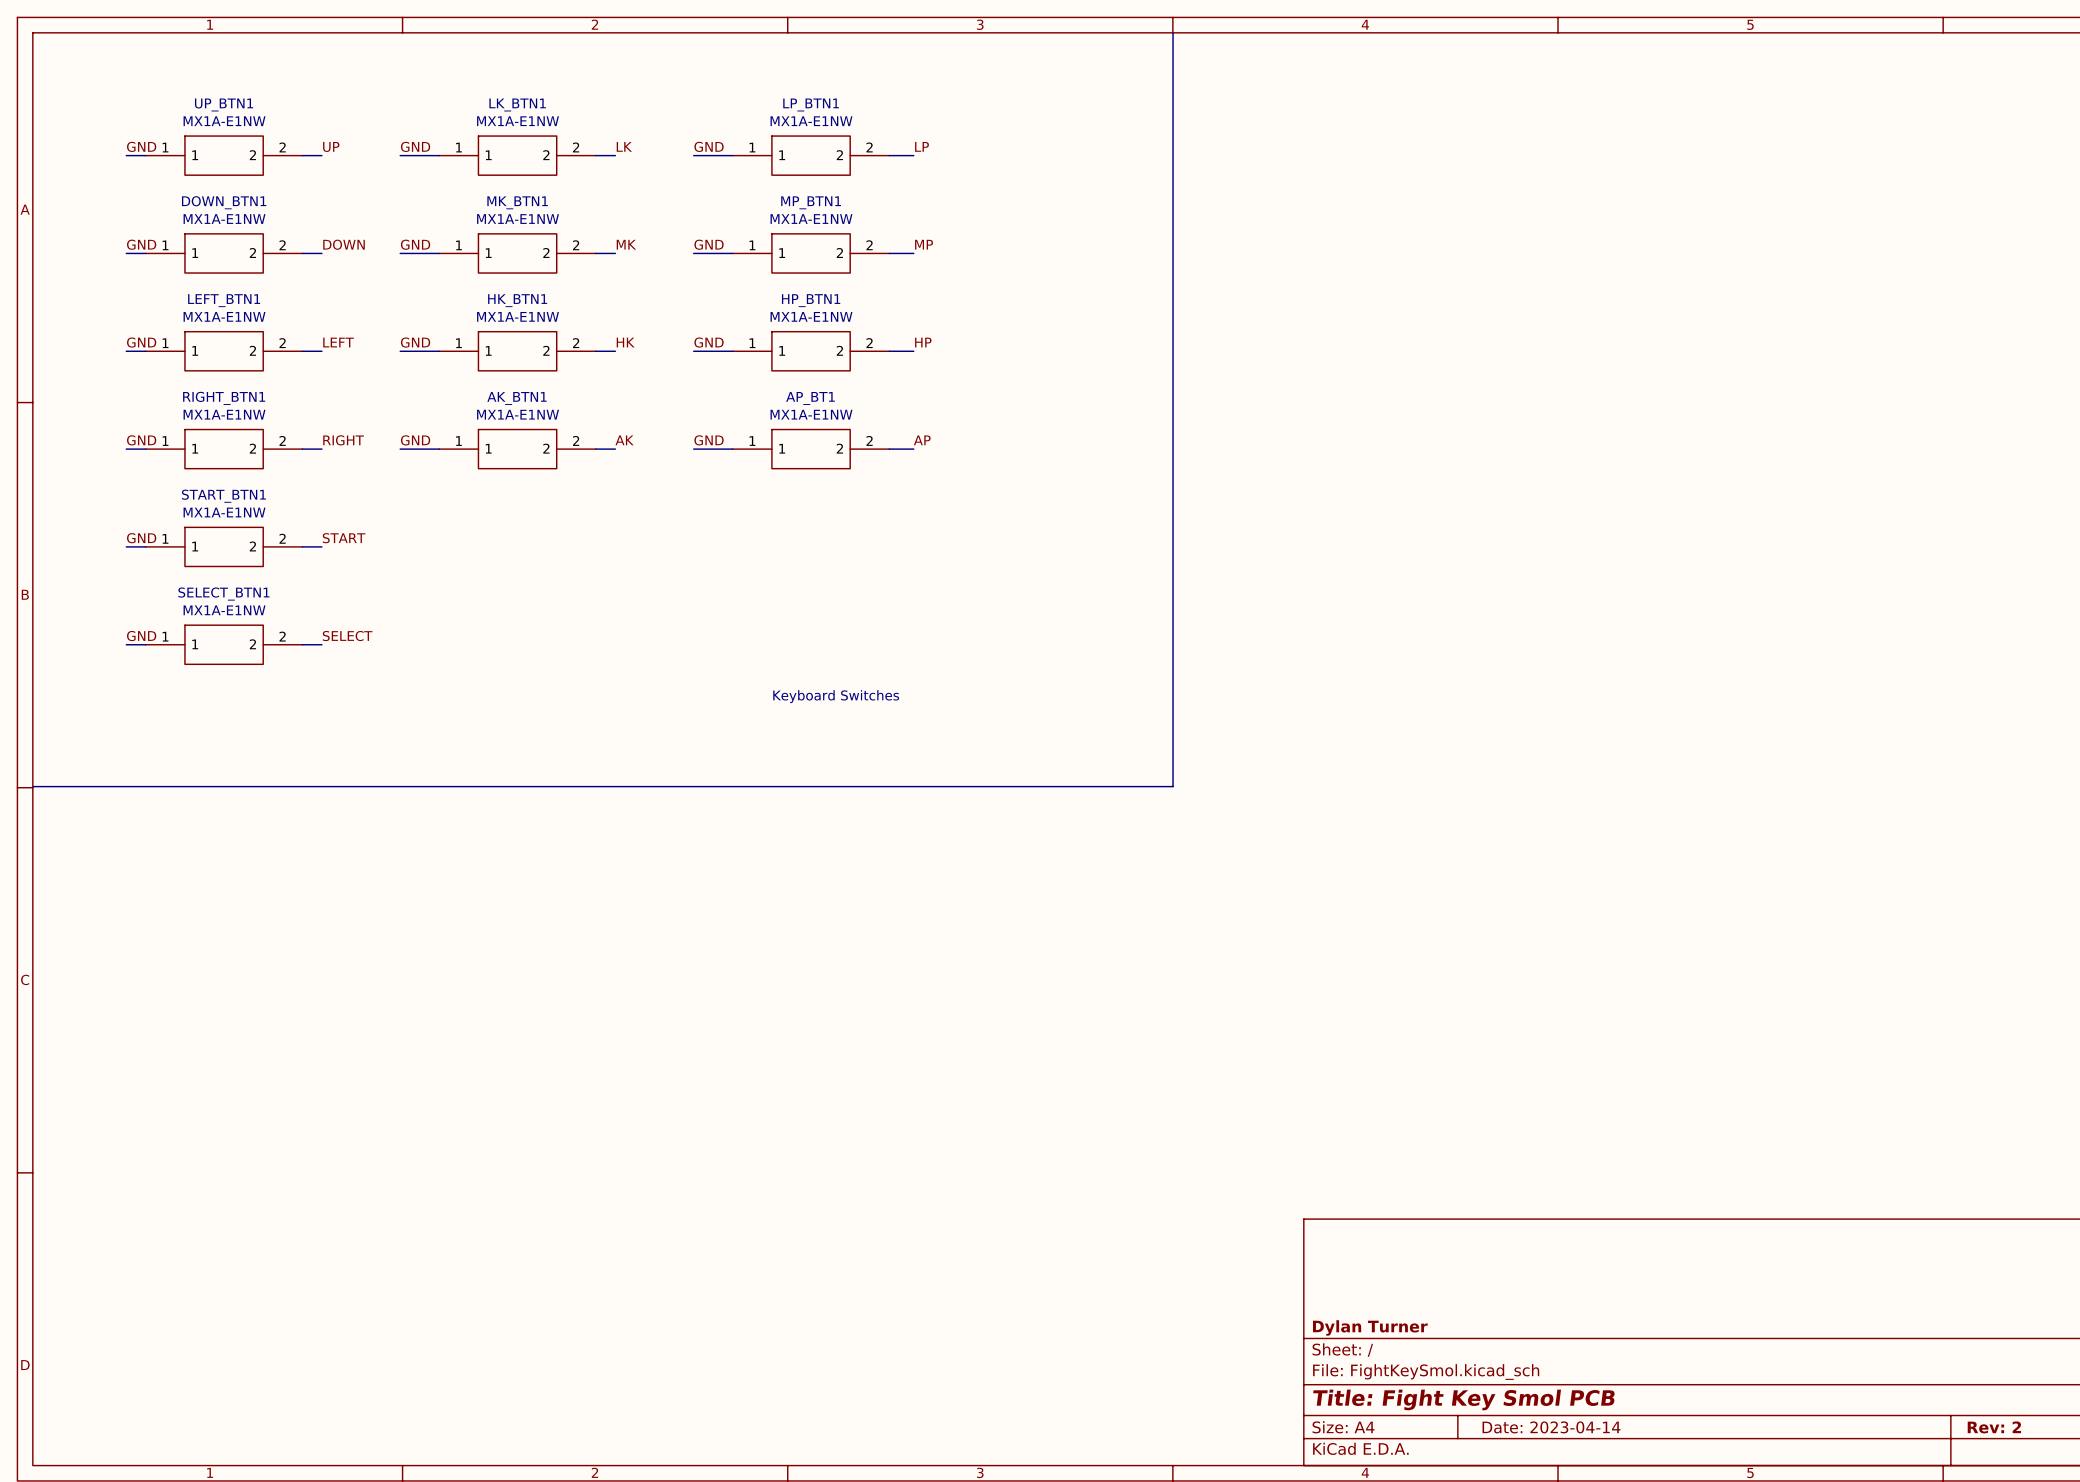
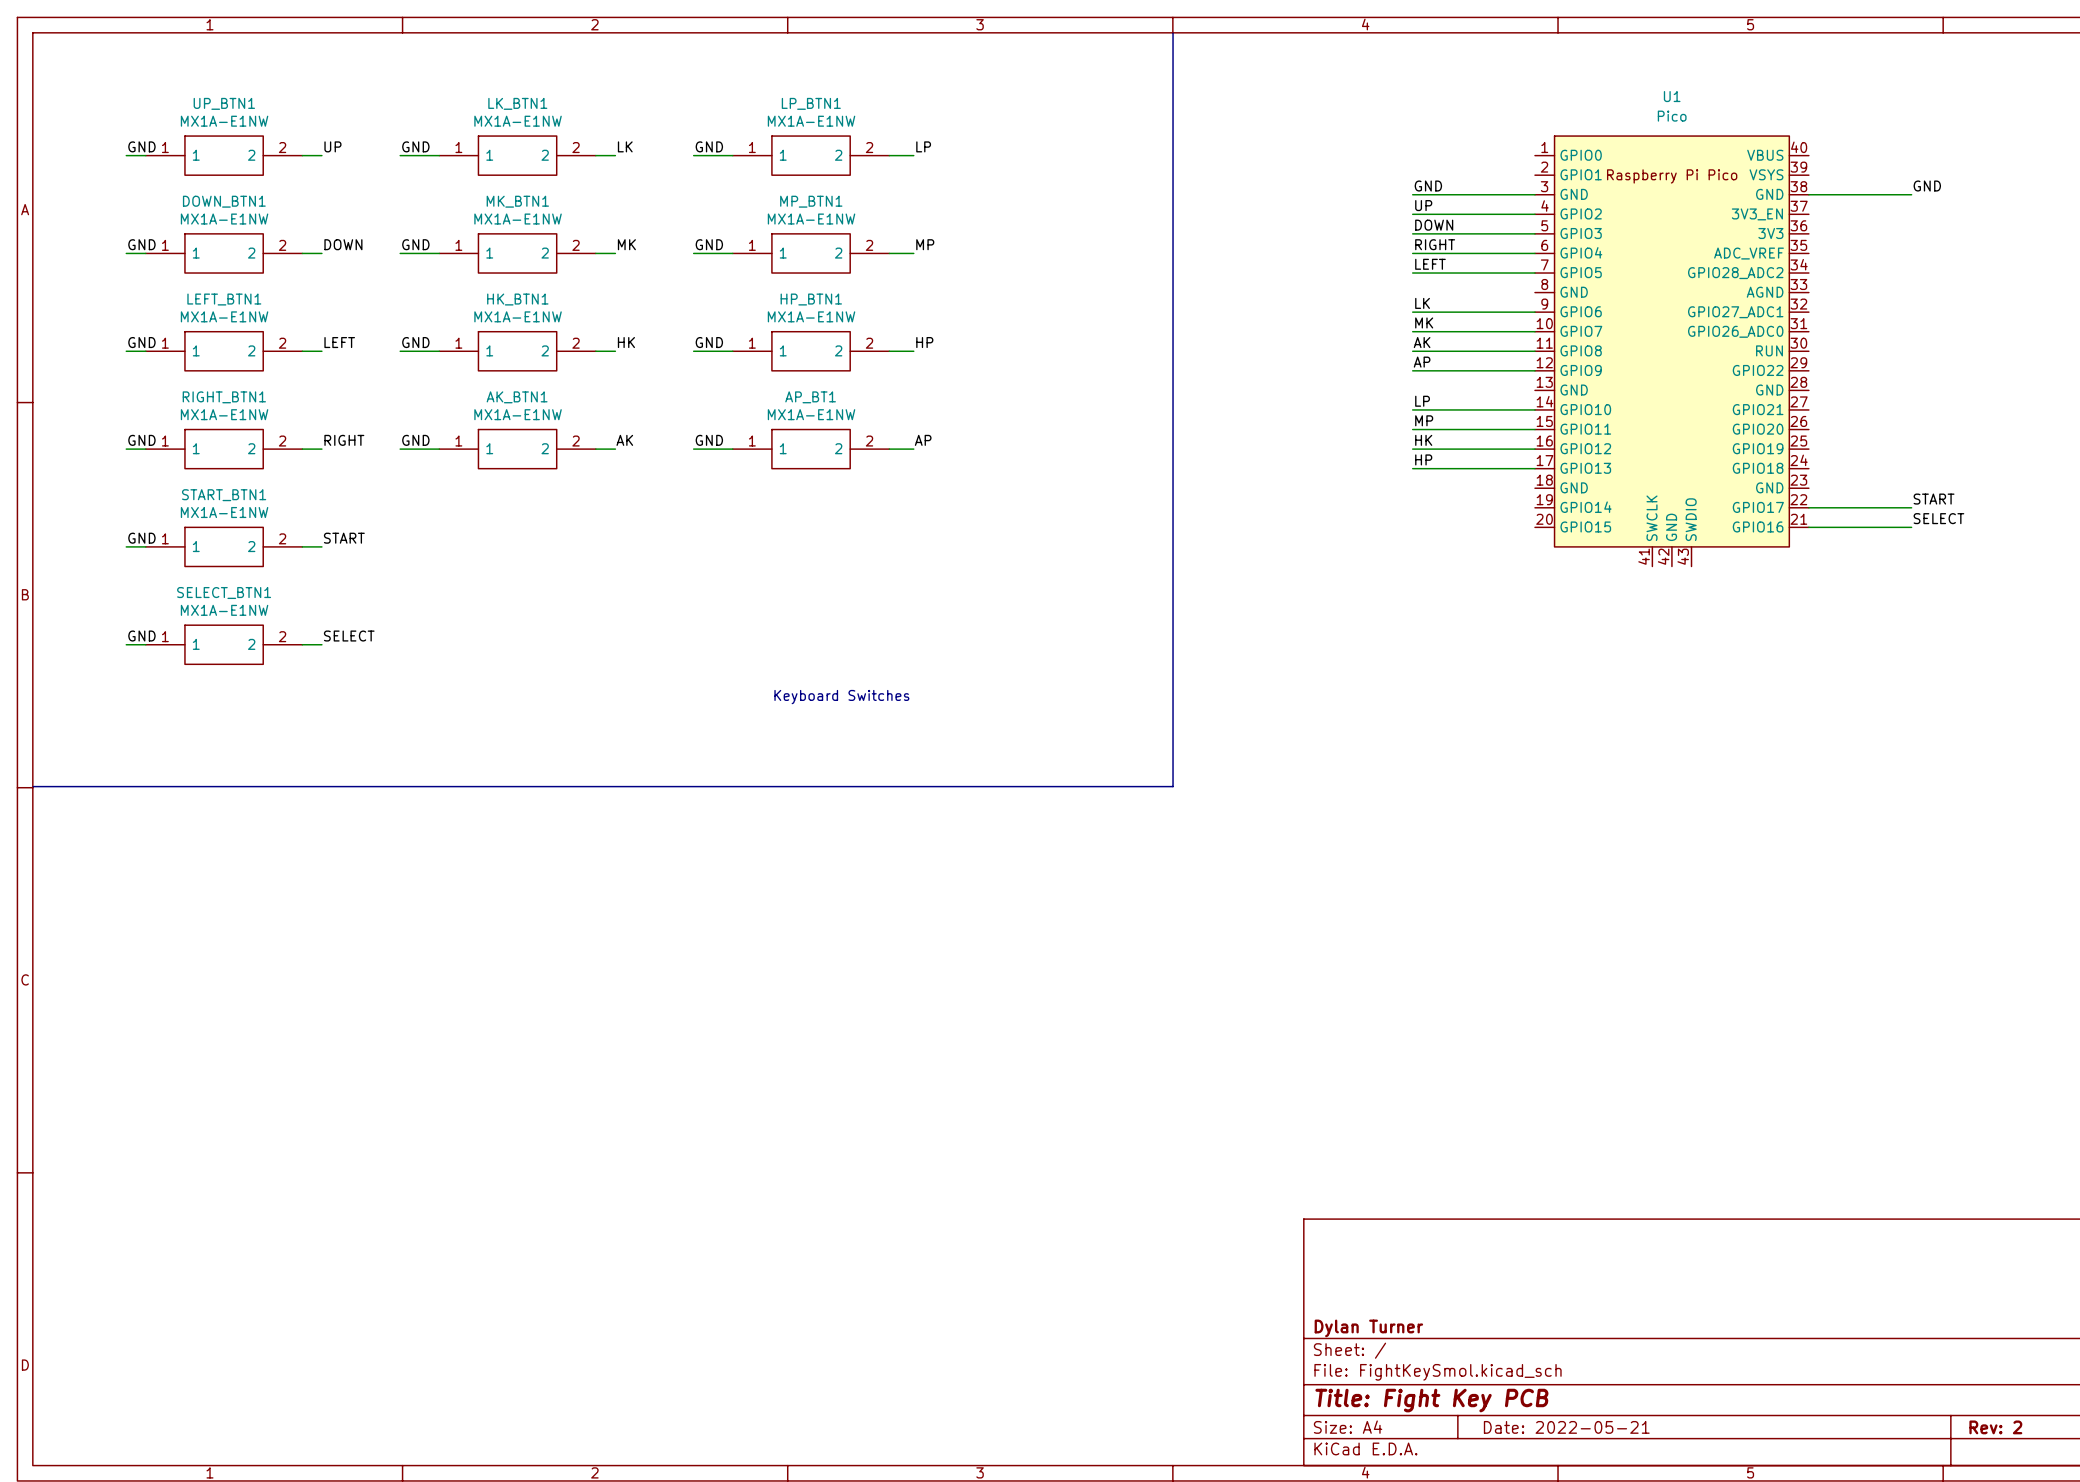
label: none -> GND (1428, 186)
label: none -> GND (1927, 186)
wire: none -> (1412, 194) (1534, 194)
wire: none -> (1808, 194) (1911, 194)
label: none -> UP (1423, 205)
wire: none -> (1412, 214) (1534, 214)
label: none -> DOWN (1434, 225)
wire: none -> (1412, 233) (1534, 233)
label: none -> RIGHT (1435, 244)
wire: none -> (1412, 253) (1534, 253)
label: none -> LEFT (1430, 264)
wire: none -> (1412, 273) (1534, 273)
label: none -> LK (1422, 303)
wire: none -> (1412, 312) (1534, 312)
label: none -> MK (1424, 322)
wire: none -> (1412, 331) (1534, 331)
label: none -> AK (1422, 342)
wire: none -> (1412, 351) (1534, 351)
U1: none -> Pico (1671, 351)
label: none -> AP (1422, 362)
wire: none -> (1412, 370) (1534, 370)
label: none -> LP (1422, 401)
wire: none -> (1412, 409) (1534, 409)
label: none -> MP (1424, 420)
wire: none -> (1412, 429) (1534, 429)
label: none -> HK (1423, 440)
wire: none -> (1412, 449) (1534, 449)
label: none -> HP (1423, 459)
wire: none -> (1412, 468) (1534, 468)
label: none -> START (1934, 499)
wire: none -> (1808, 507) (1911, 507)
label: none -> SELECT (1938, 518)
wire: none -> (1808, 527) (1911, 527)
title block: Title: Fight Key Smol PCB (1464, 1399) -> Title: Fight Key PCB (1431, 1400)
title block: Date: 2023-04-14 (1551, 1427) -> Date: 2022-05-21 (1566, 1427)

